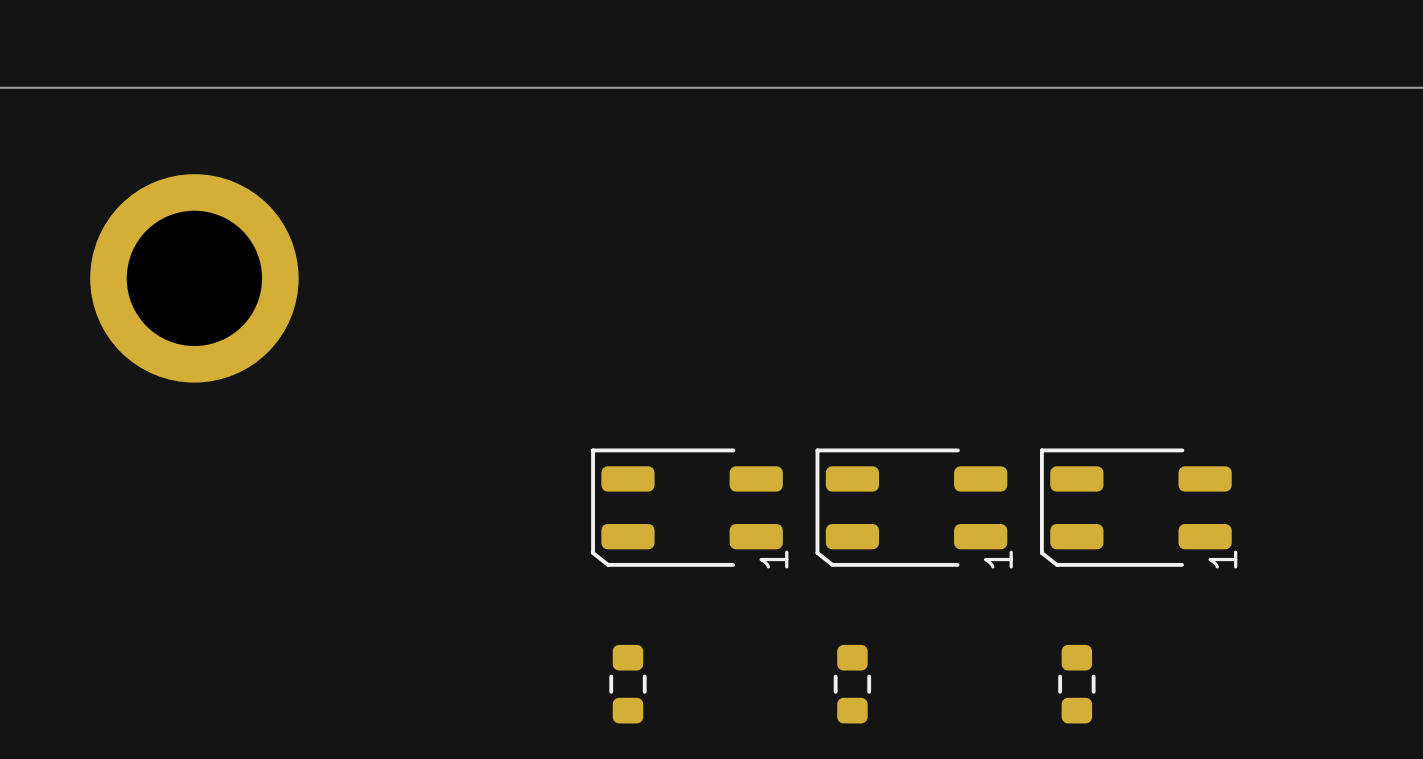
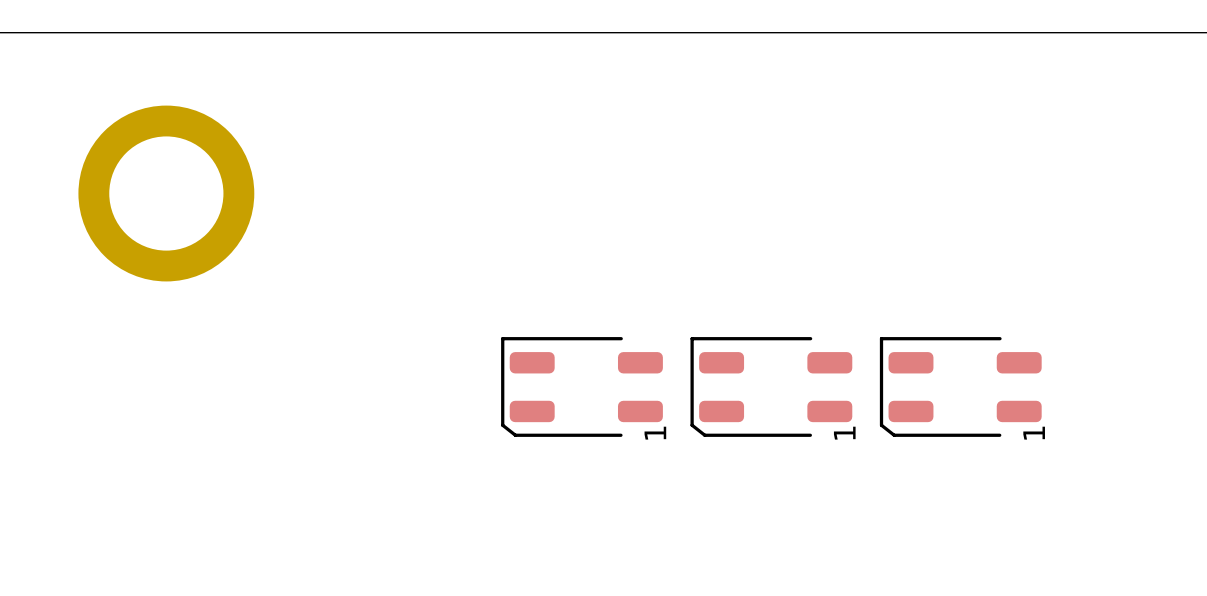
part: (627, 684) -> none
part: (852, 684) -> none
part: (1076, 684) -> none

